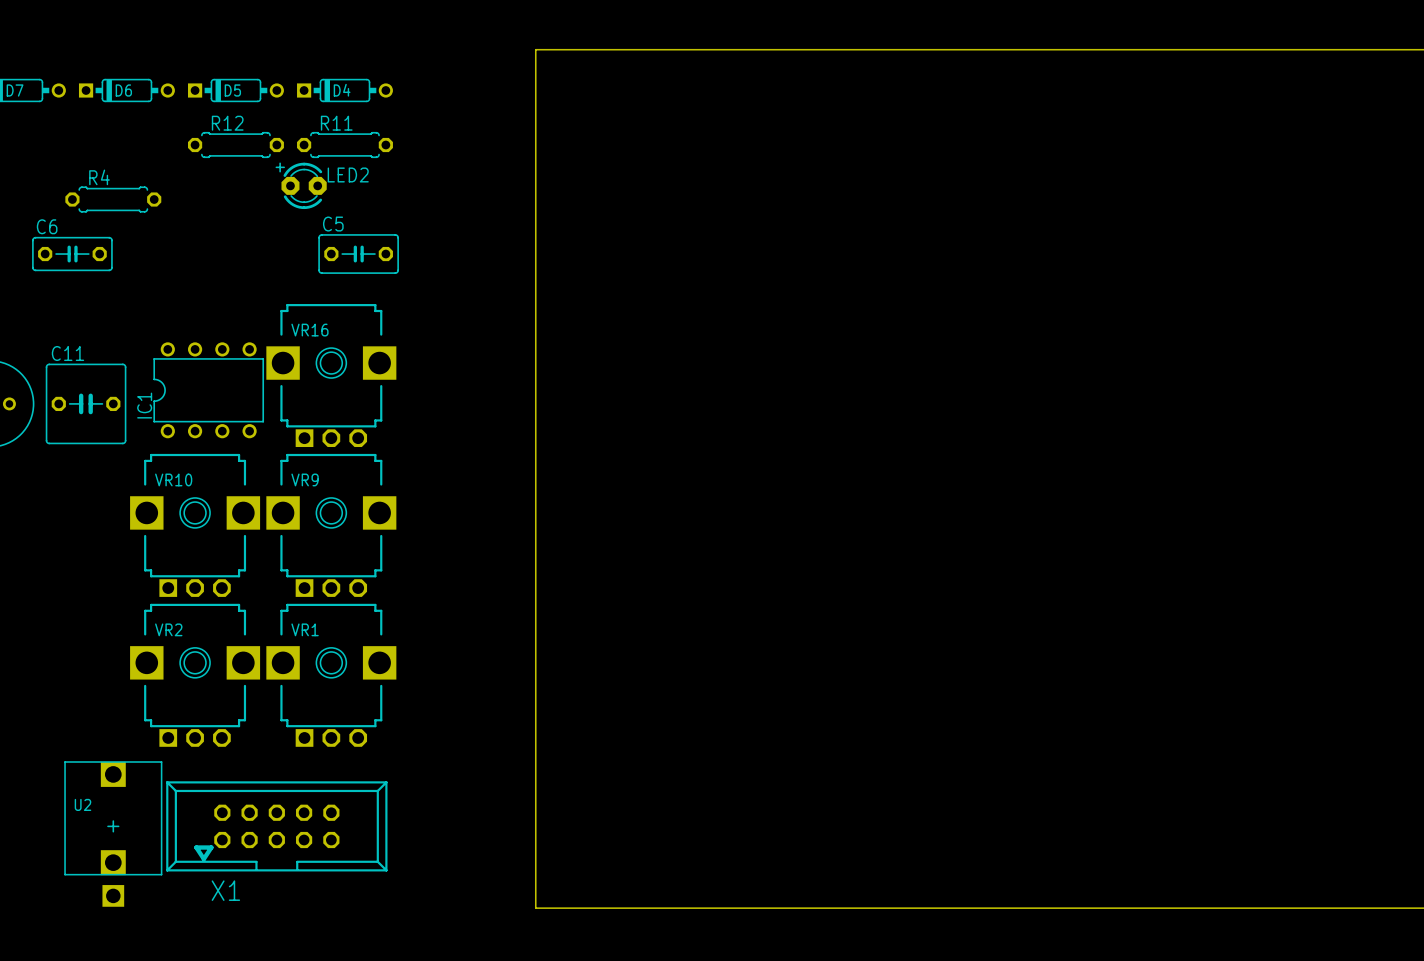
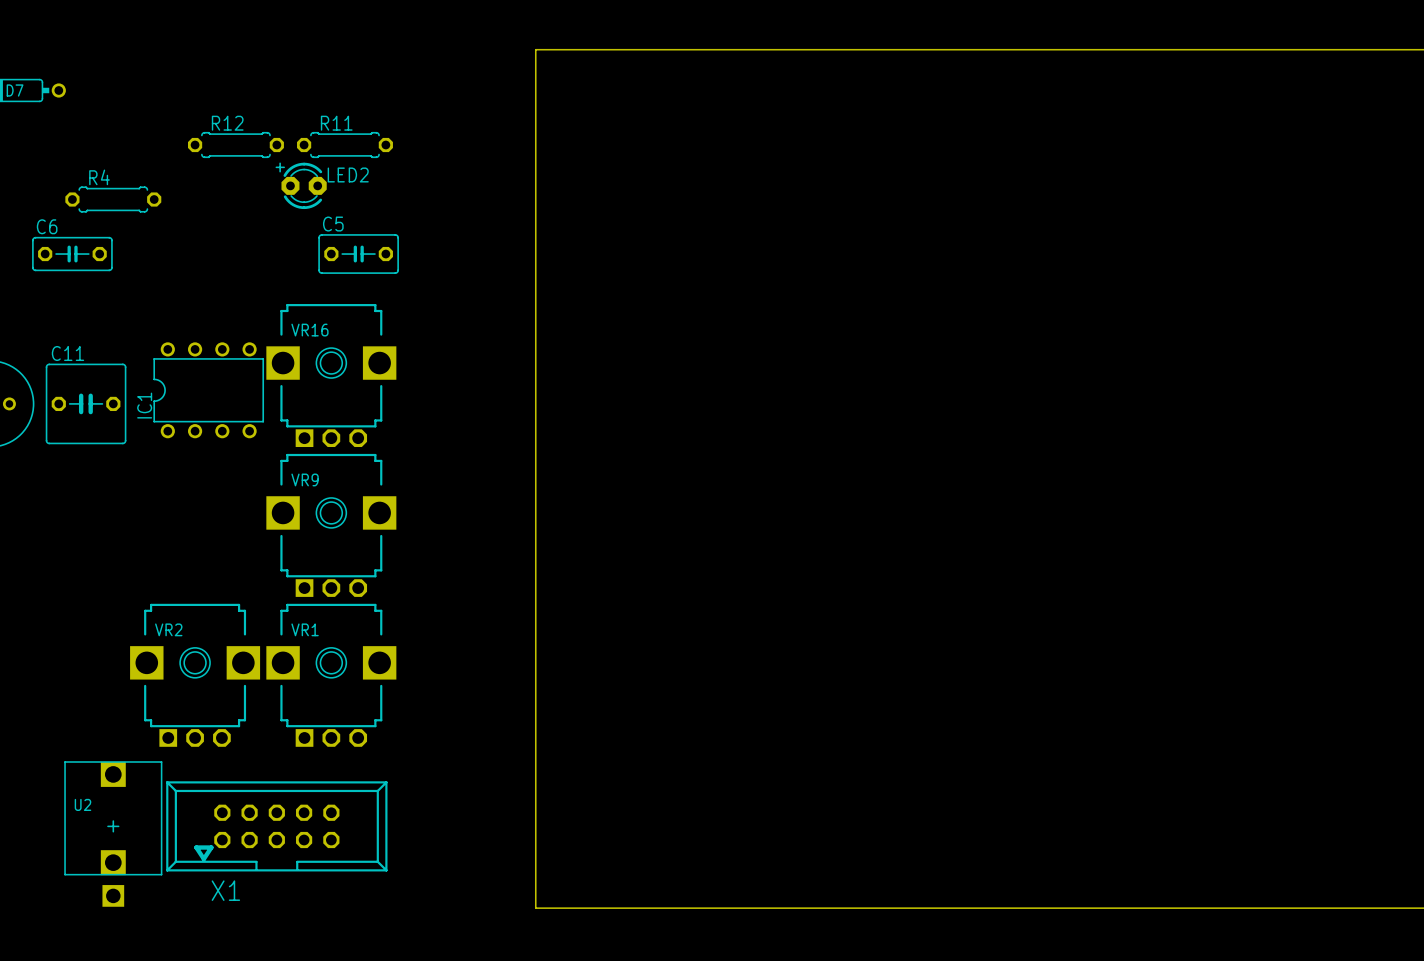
D6: (126, 90) -> none
D5: (235, 90) -> none
D4: (344, 90) -> none
VR10: (195, 525) -> none

